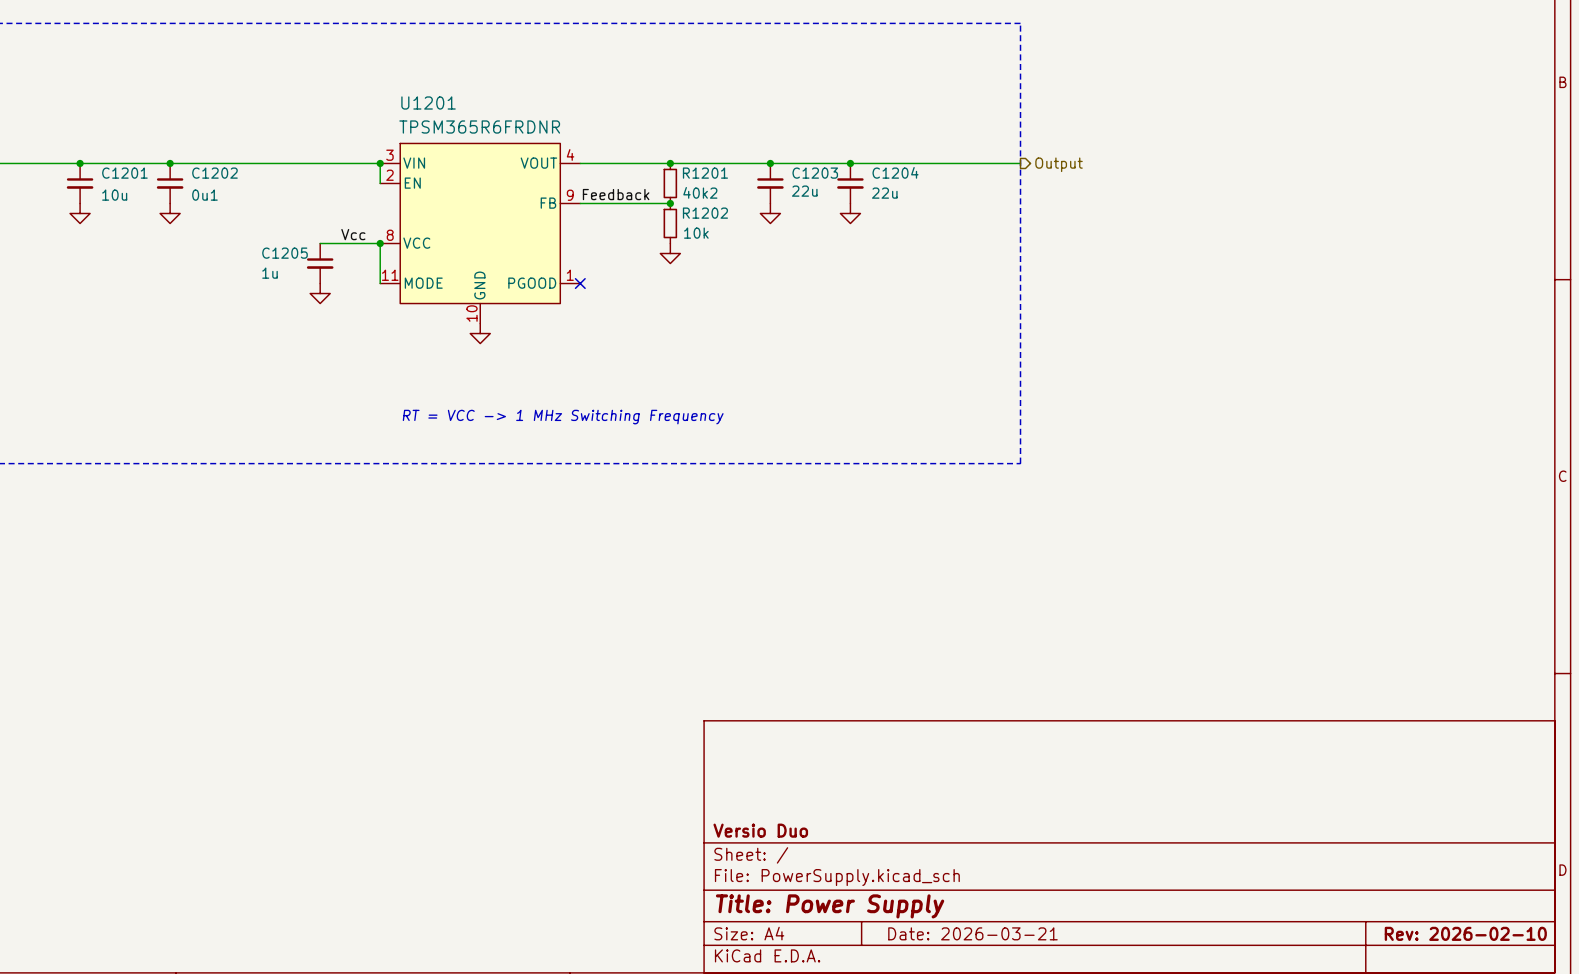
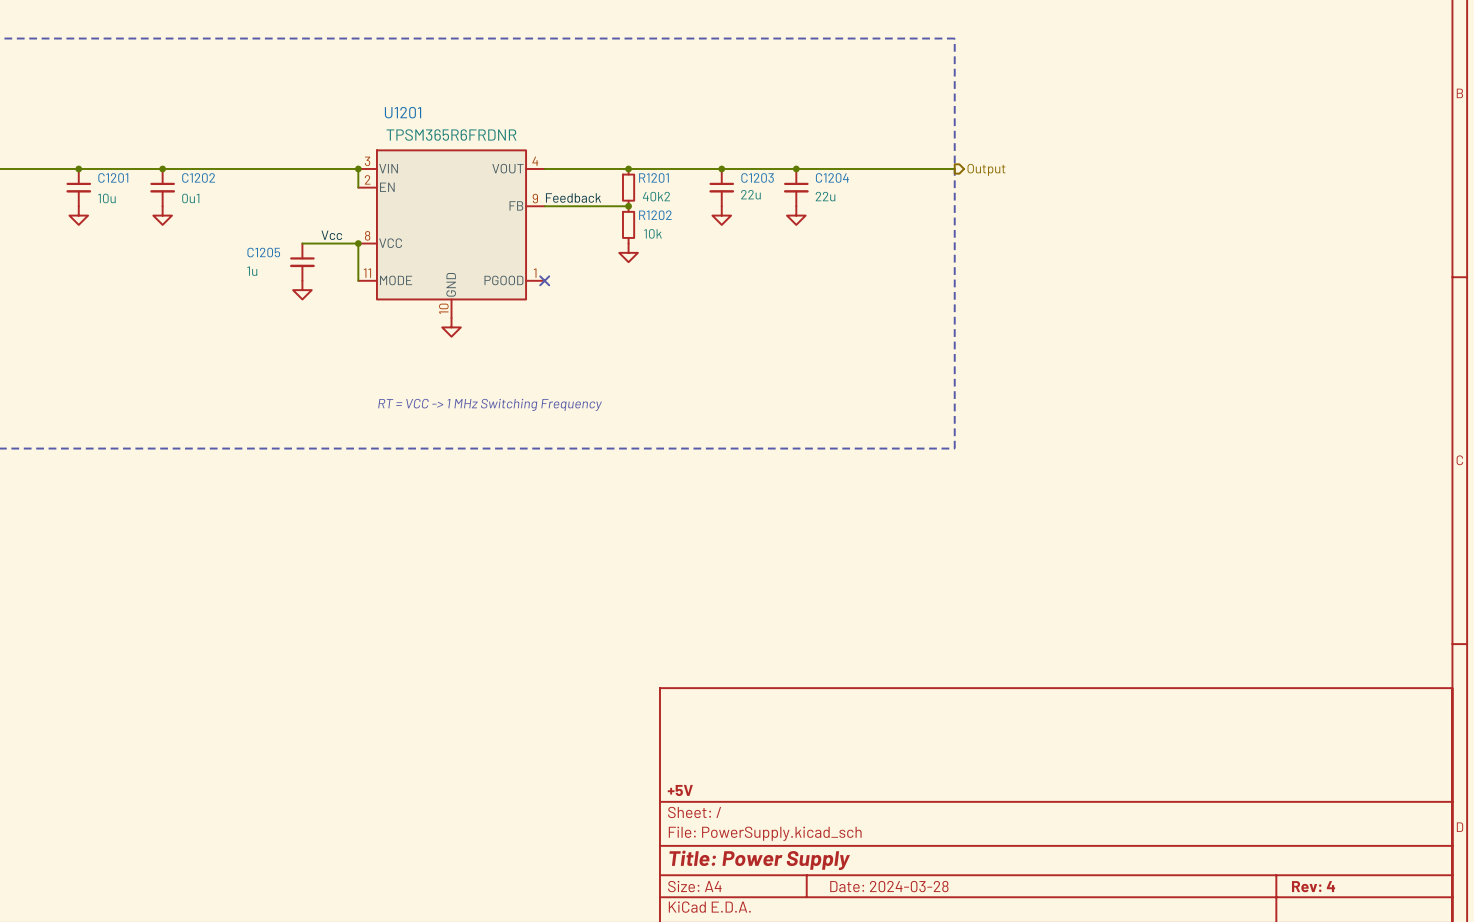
title block: Versio Duo (760, 830) -> +5V (680, 790)
title block: Date: 2026-03-21 (972, 933) -> Date: 2024-03-28 (889, 886)
title block: Rev: 2026-02-10 (1465, 933) -> Rev: 4 (1313, 886)

